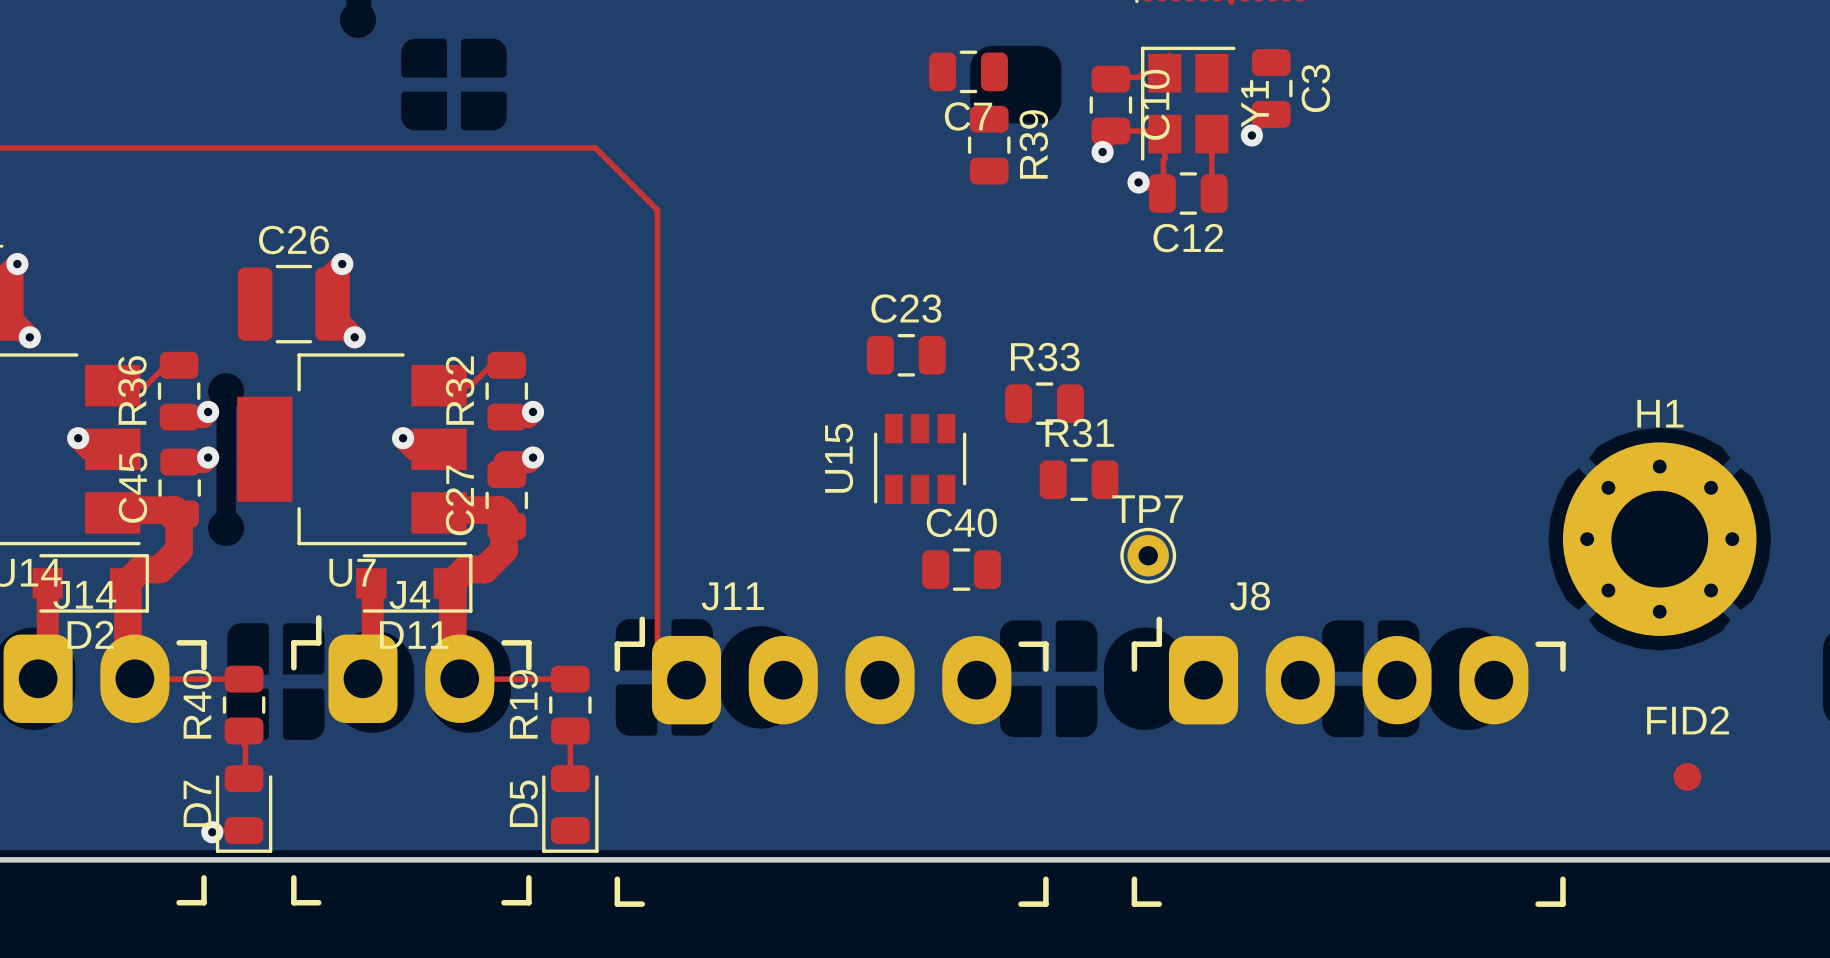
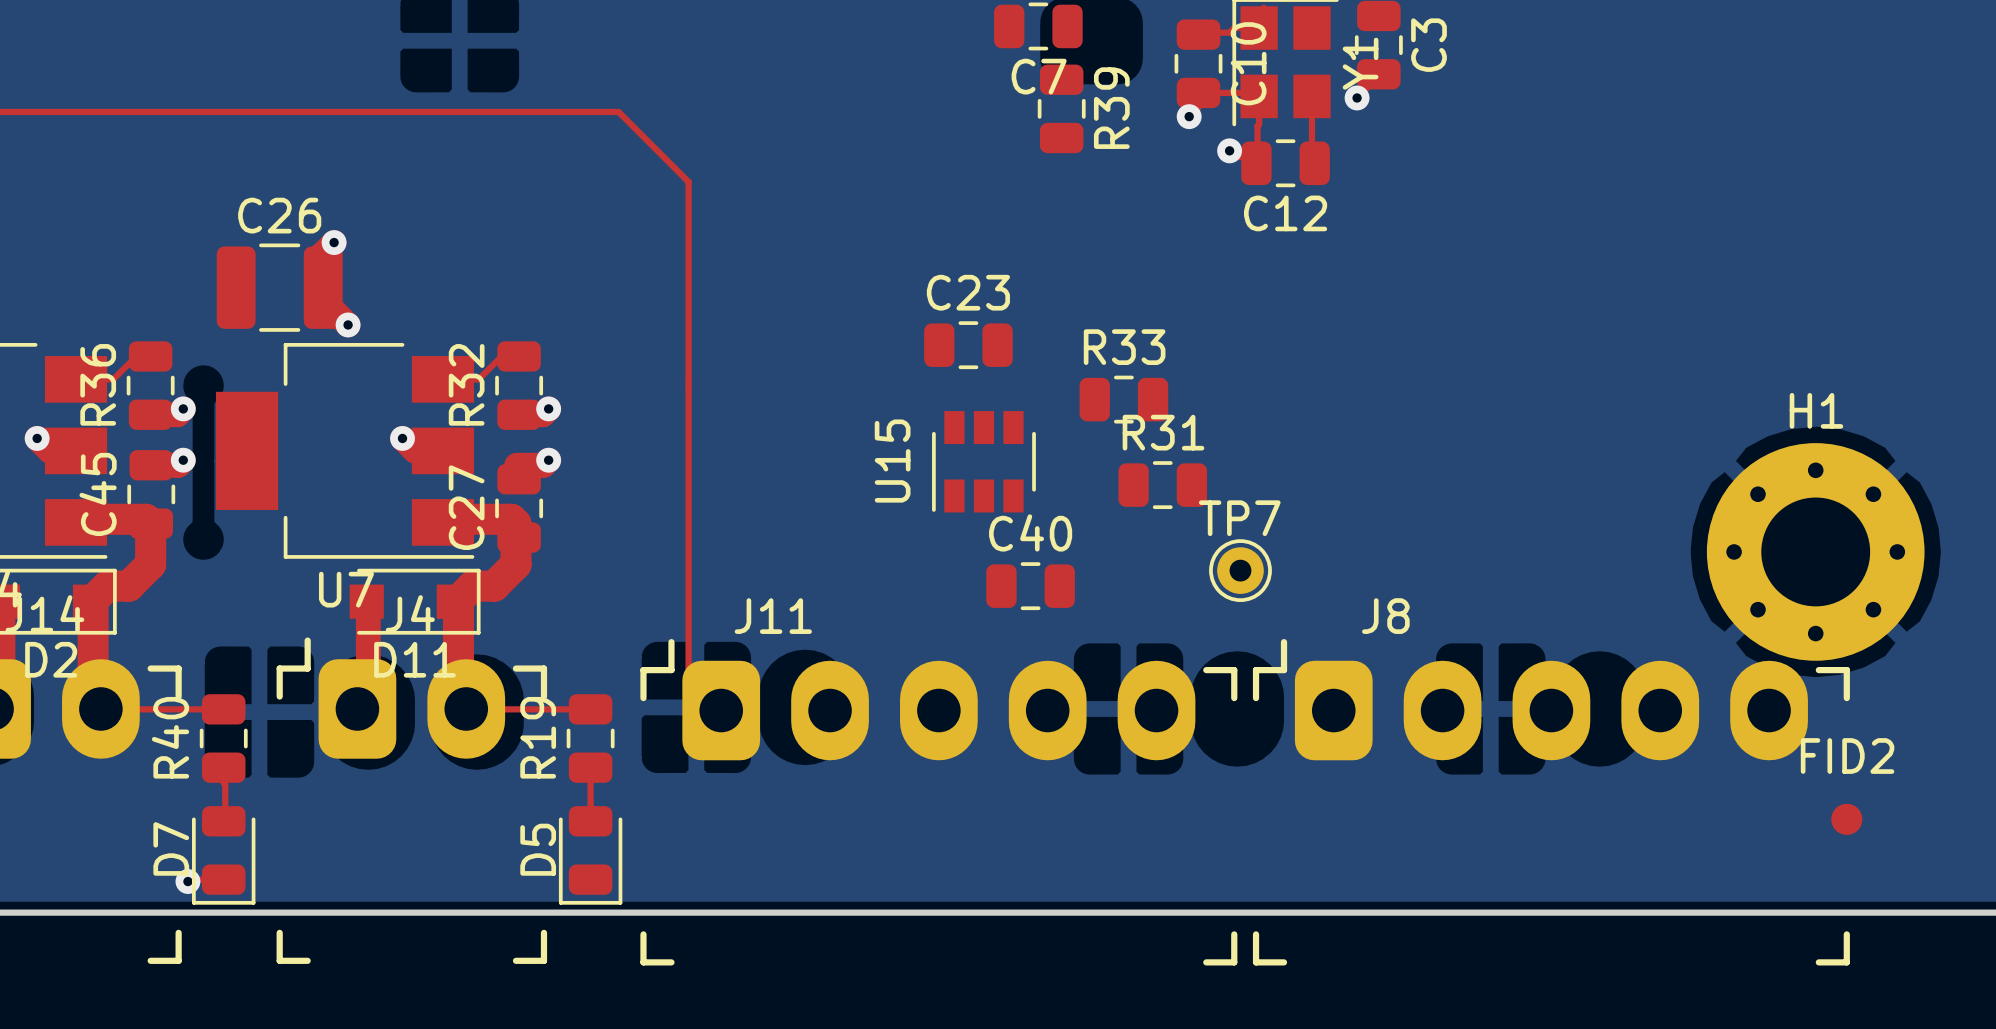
J11 footprint: [614, 616, 1049, 907] -> [640, 639, 1238, 966]
J8 footprint: [1131, 616, 1566, 907] -> [1252, 639, 1850, 966]

